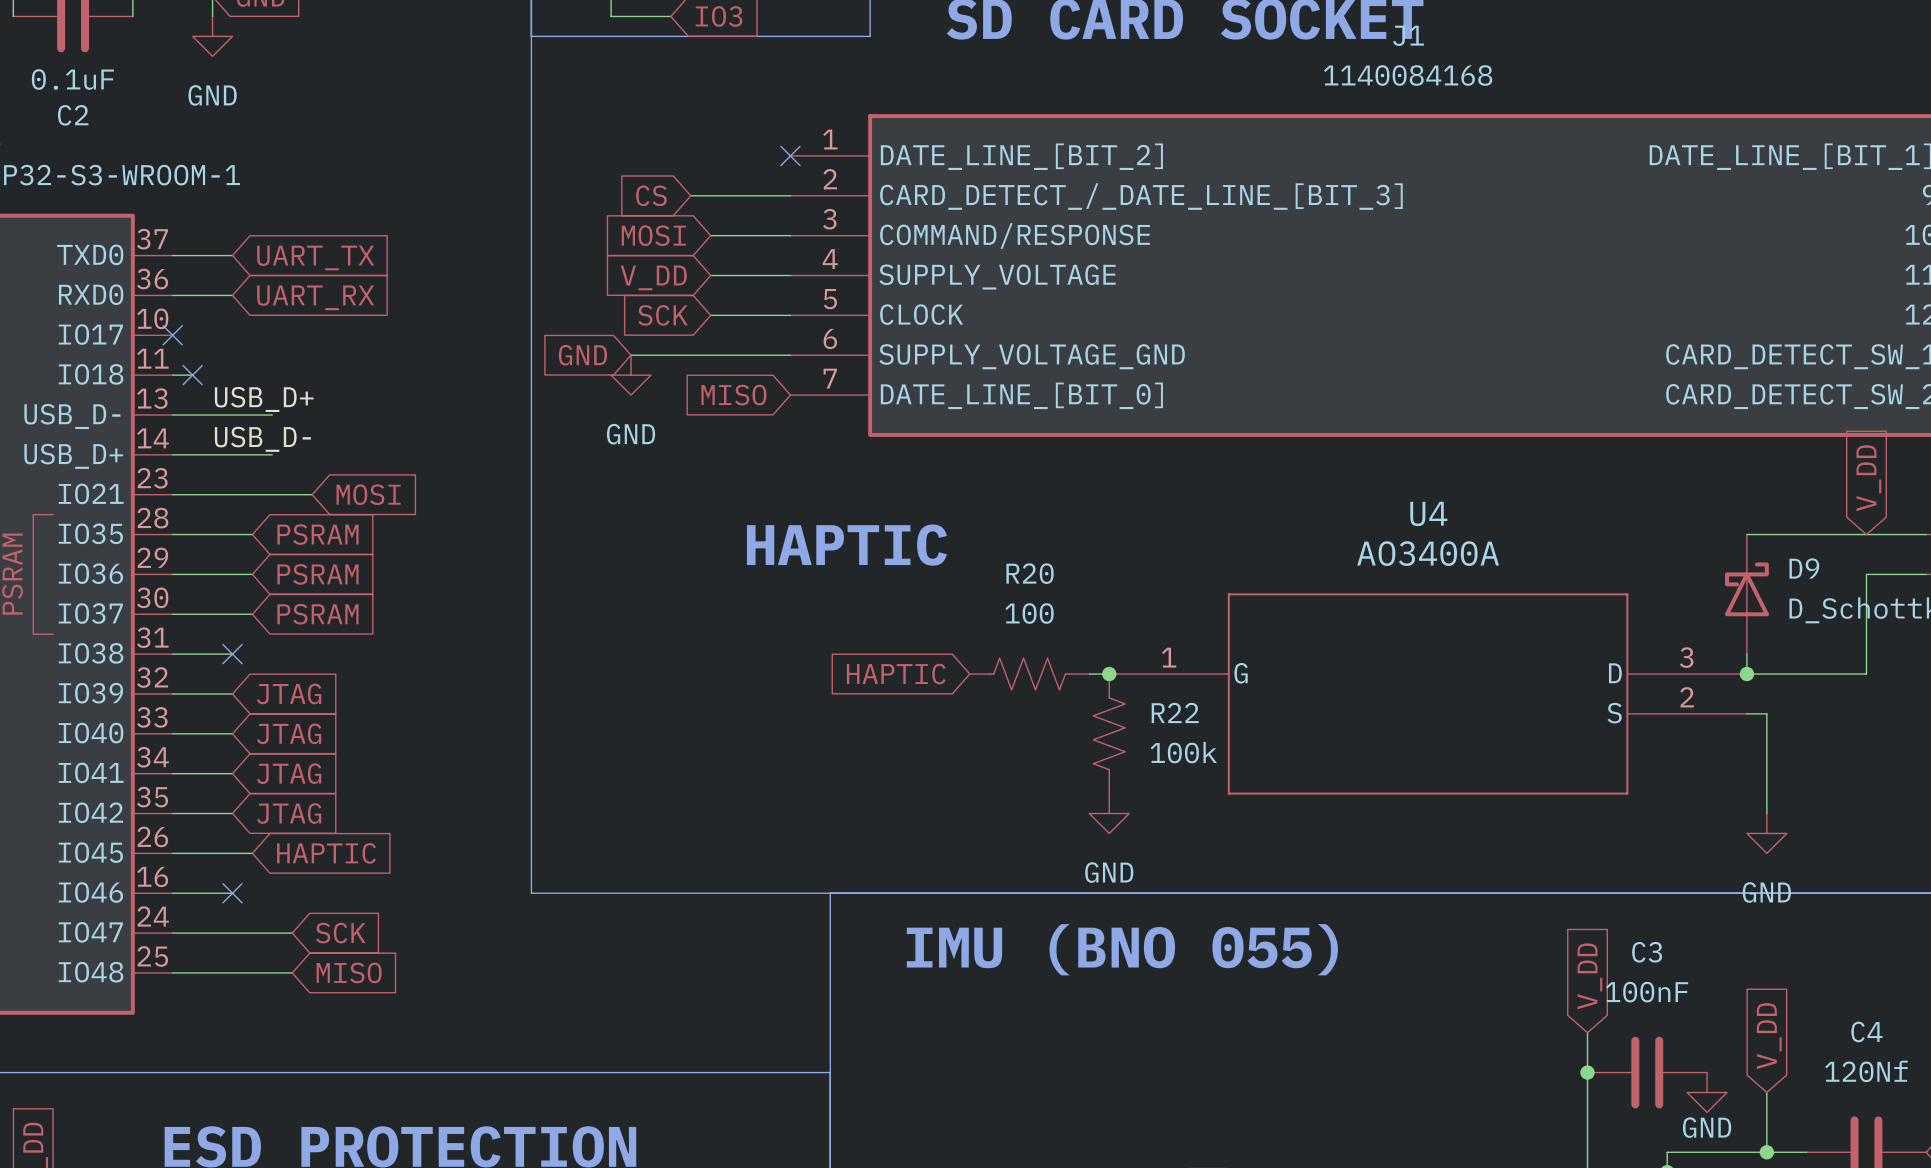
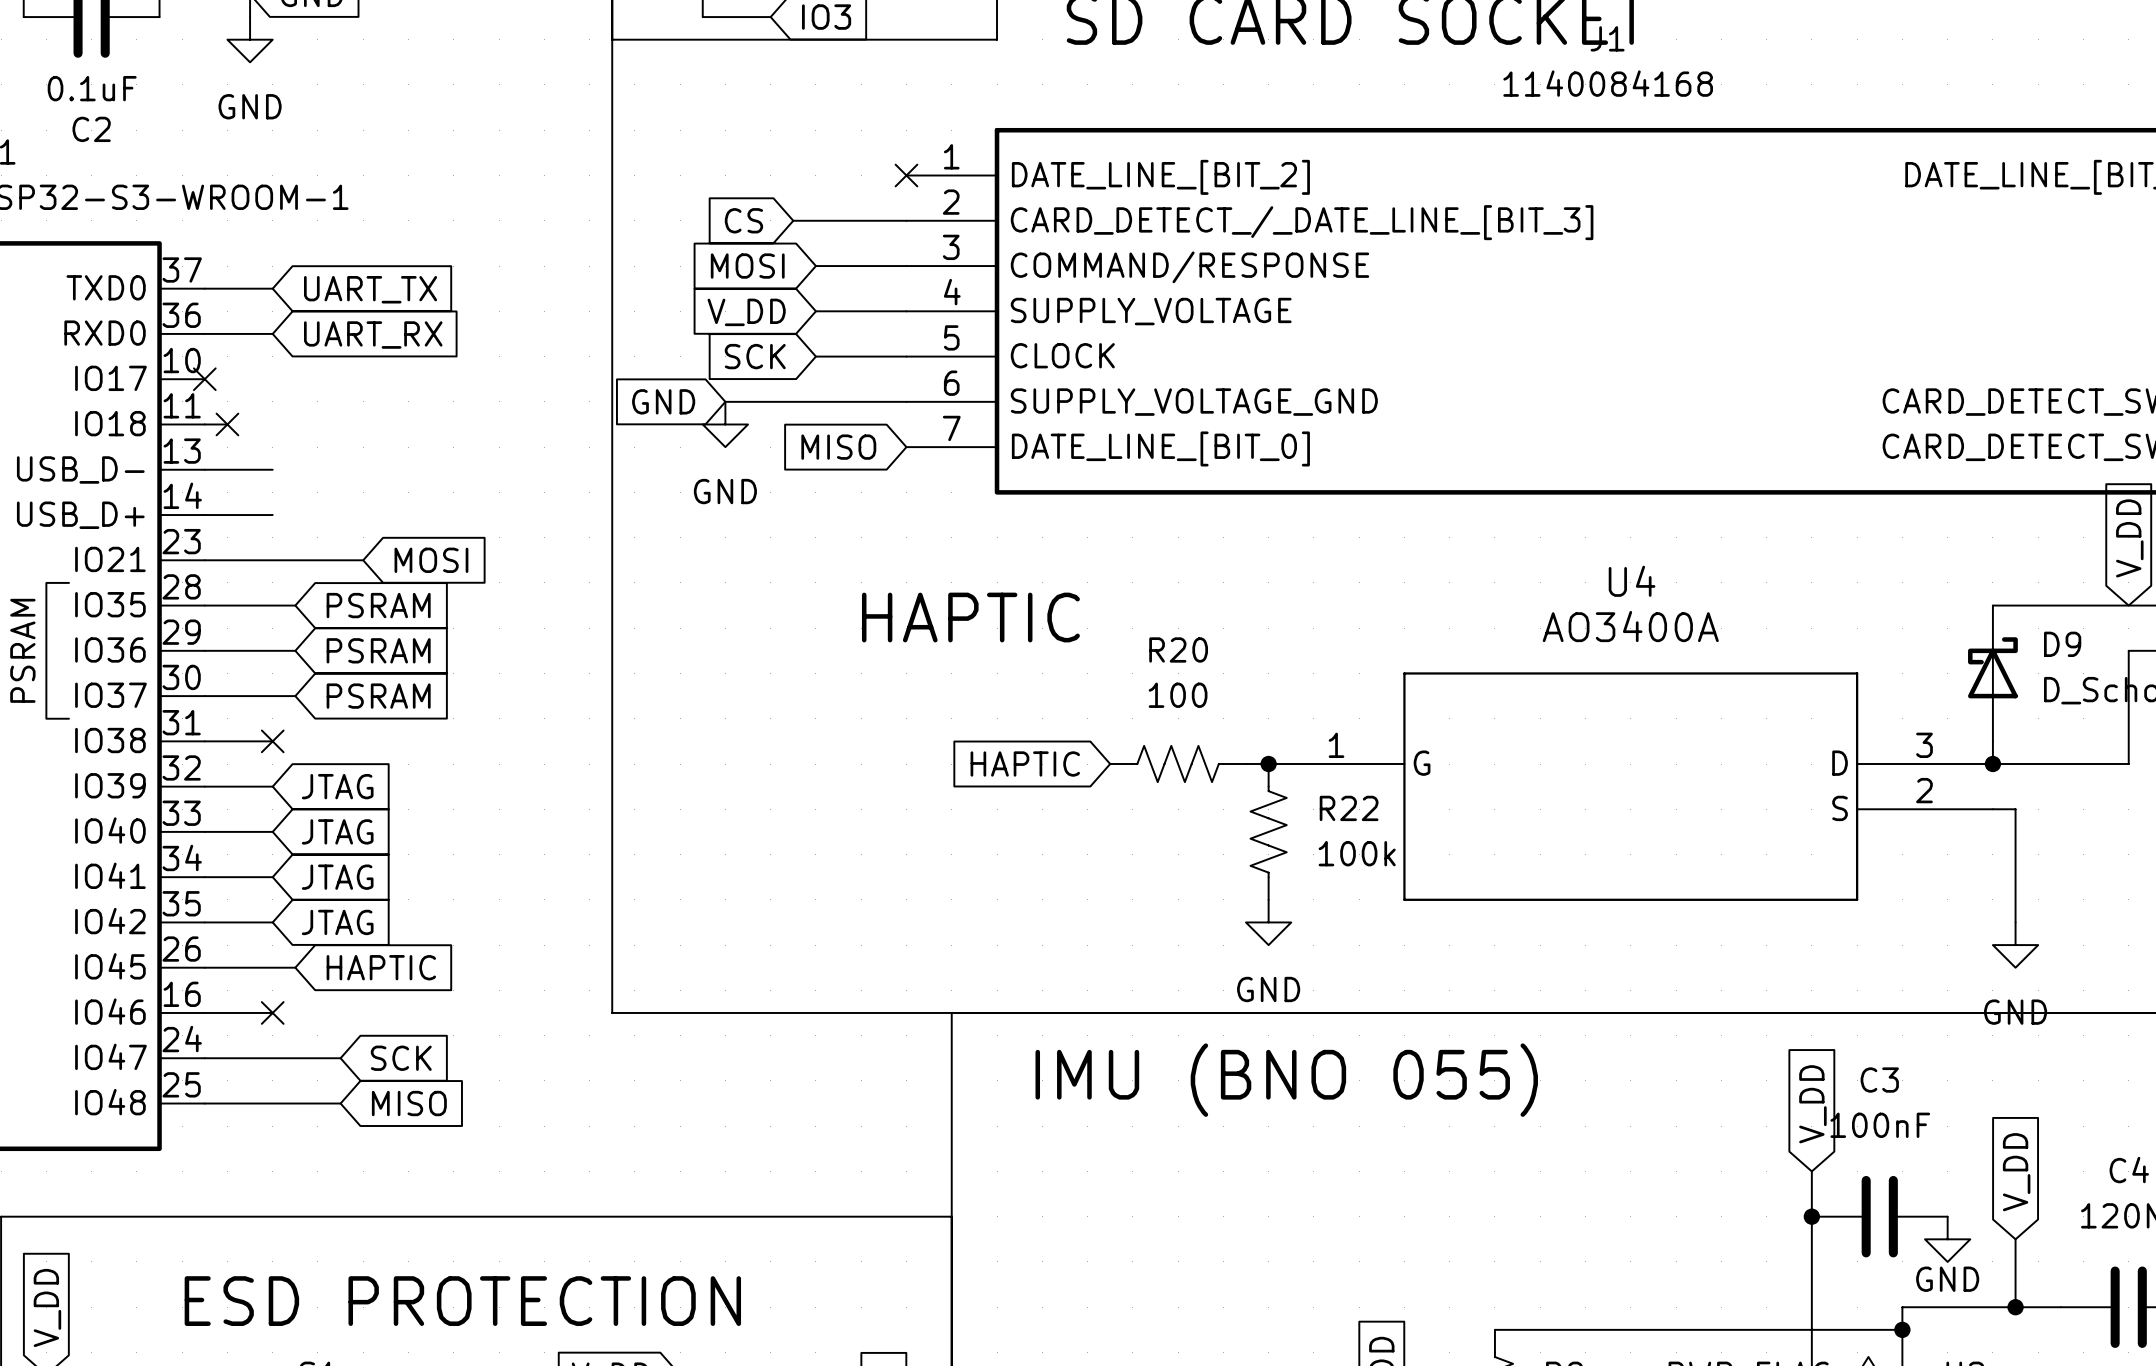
label: USB_D+ (264, 399) -> none
wire: (232, 414) (272, 414) -> none
label: USB_D- (262, 439) -> none
wire: (232, 454) (272, 454) -> none

